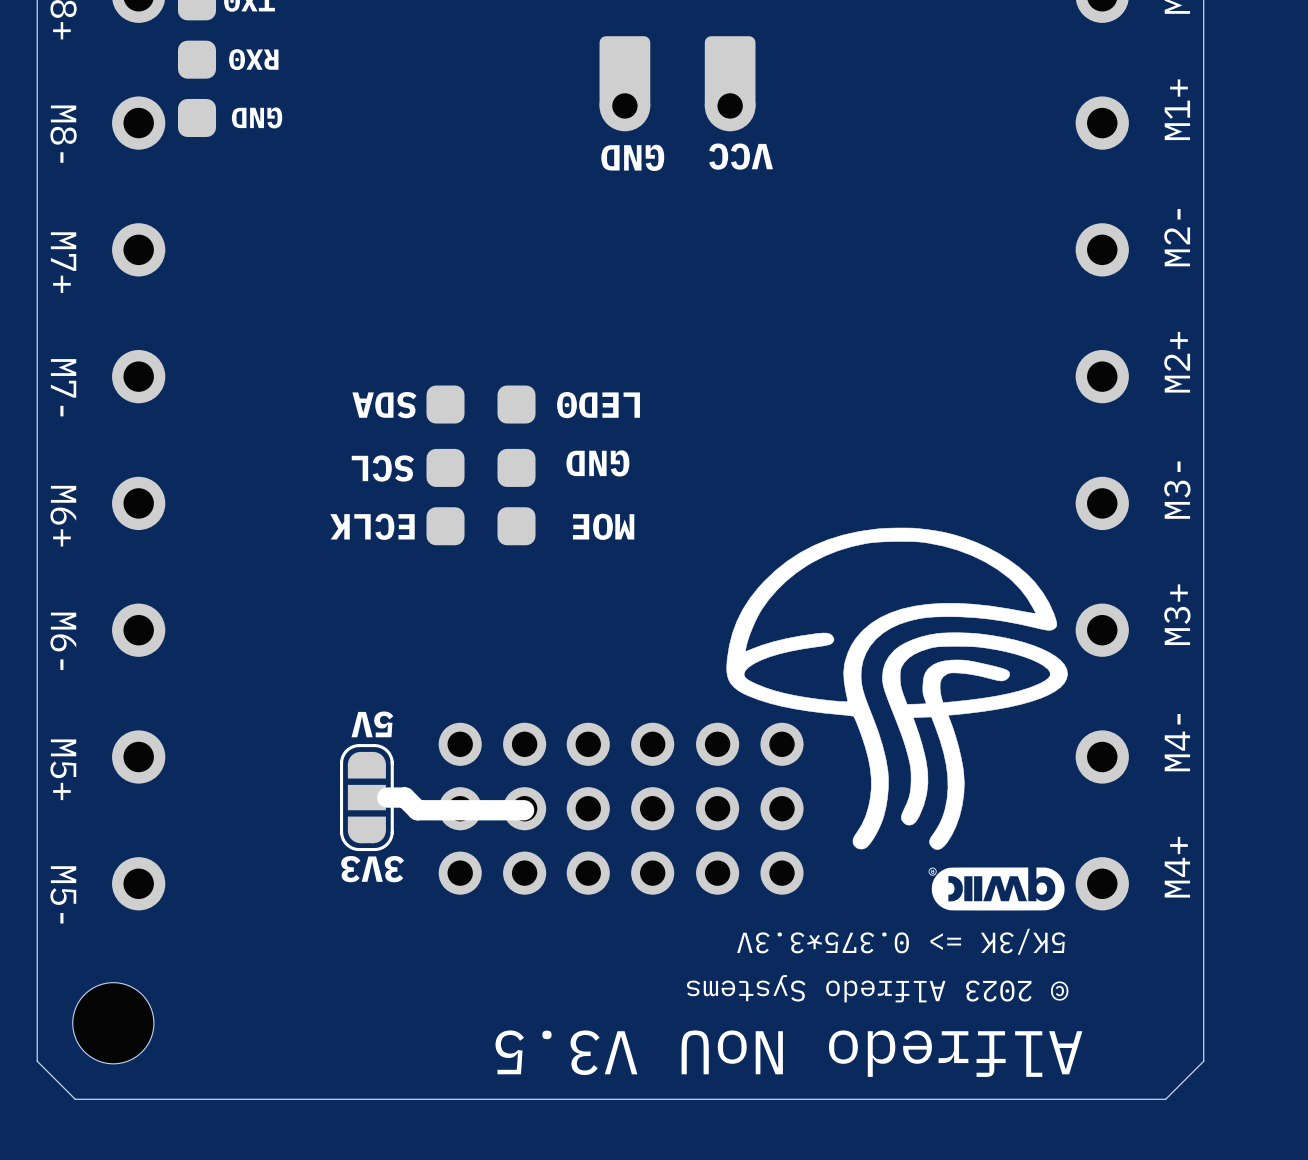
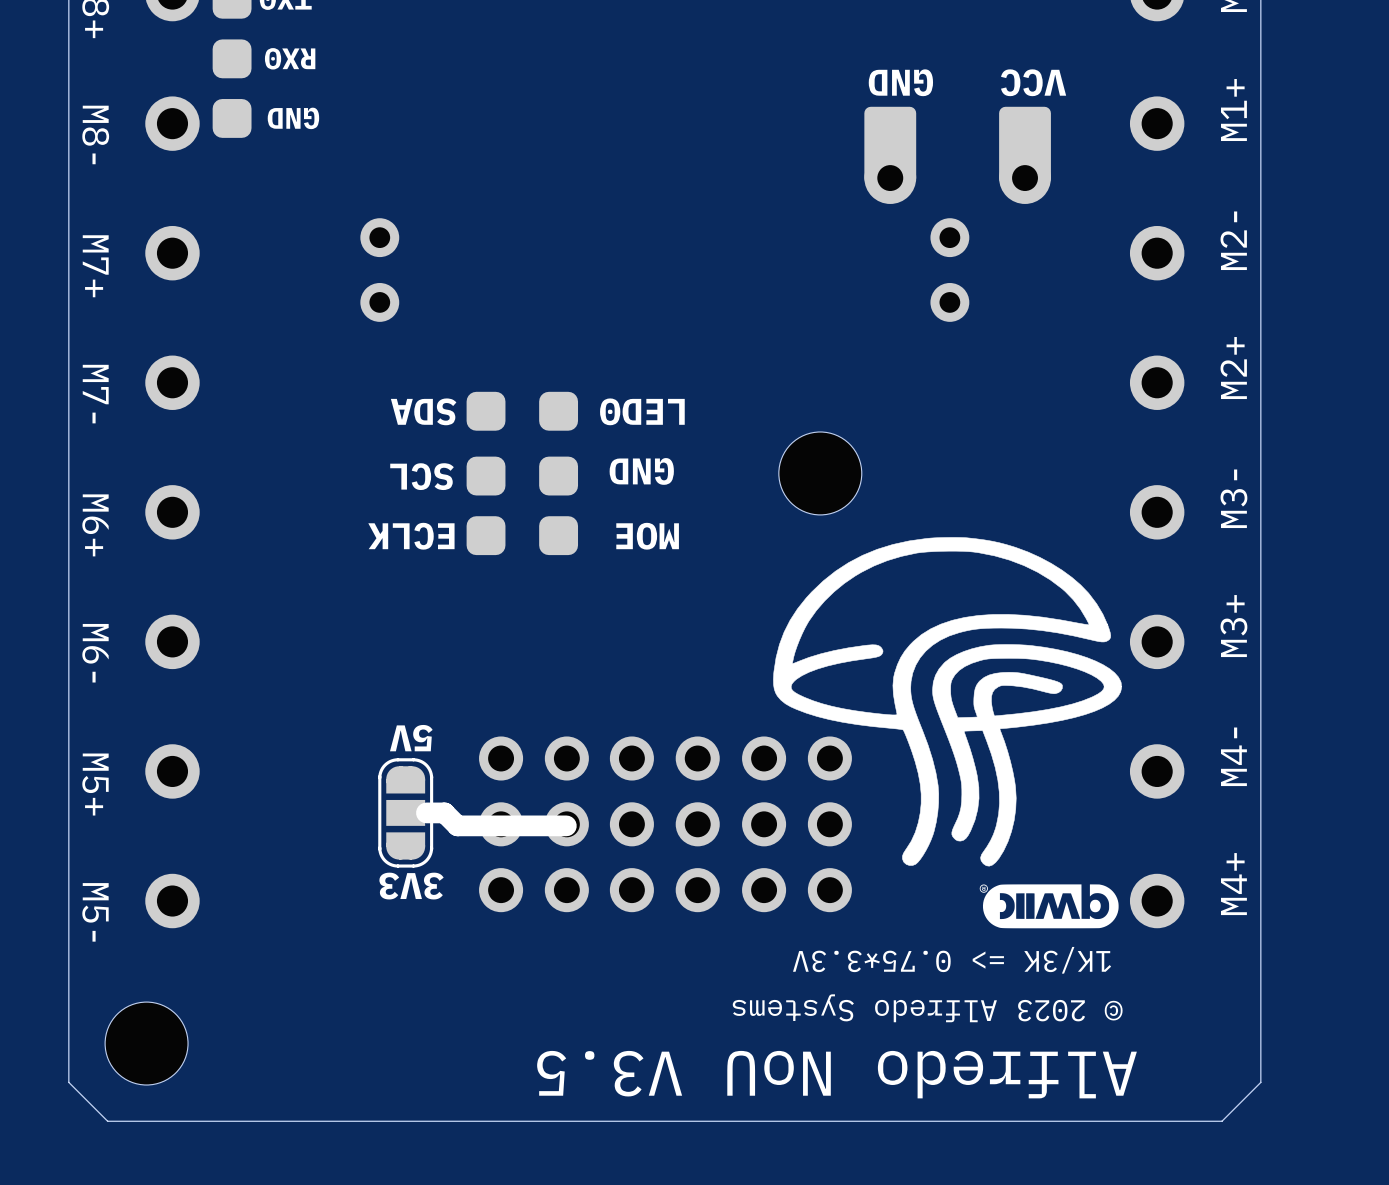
part: (624, 83) -> none
part: (730, 83) -> none
part: none -> (890, 155)
part: none -> (1025, 155)
text position: VCC (741, 156) -> VCC (1033, 82)
text position: GND (632, 157) -> GND (900, 82)
part: none -> (379, 270)
part: none -> (949, 270)
part: none -> (820, 473)
text: 5K/3K => 0.375*3.3V (901, 941) -> 1K/3K => 0.75*3.3V (952, 960)

